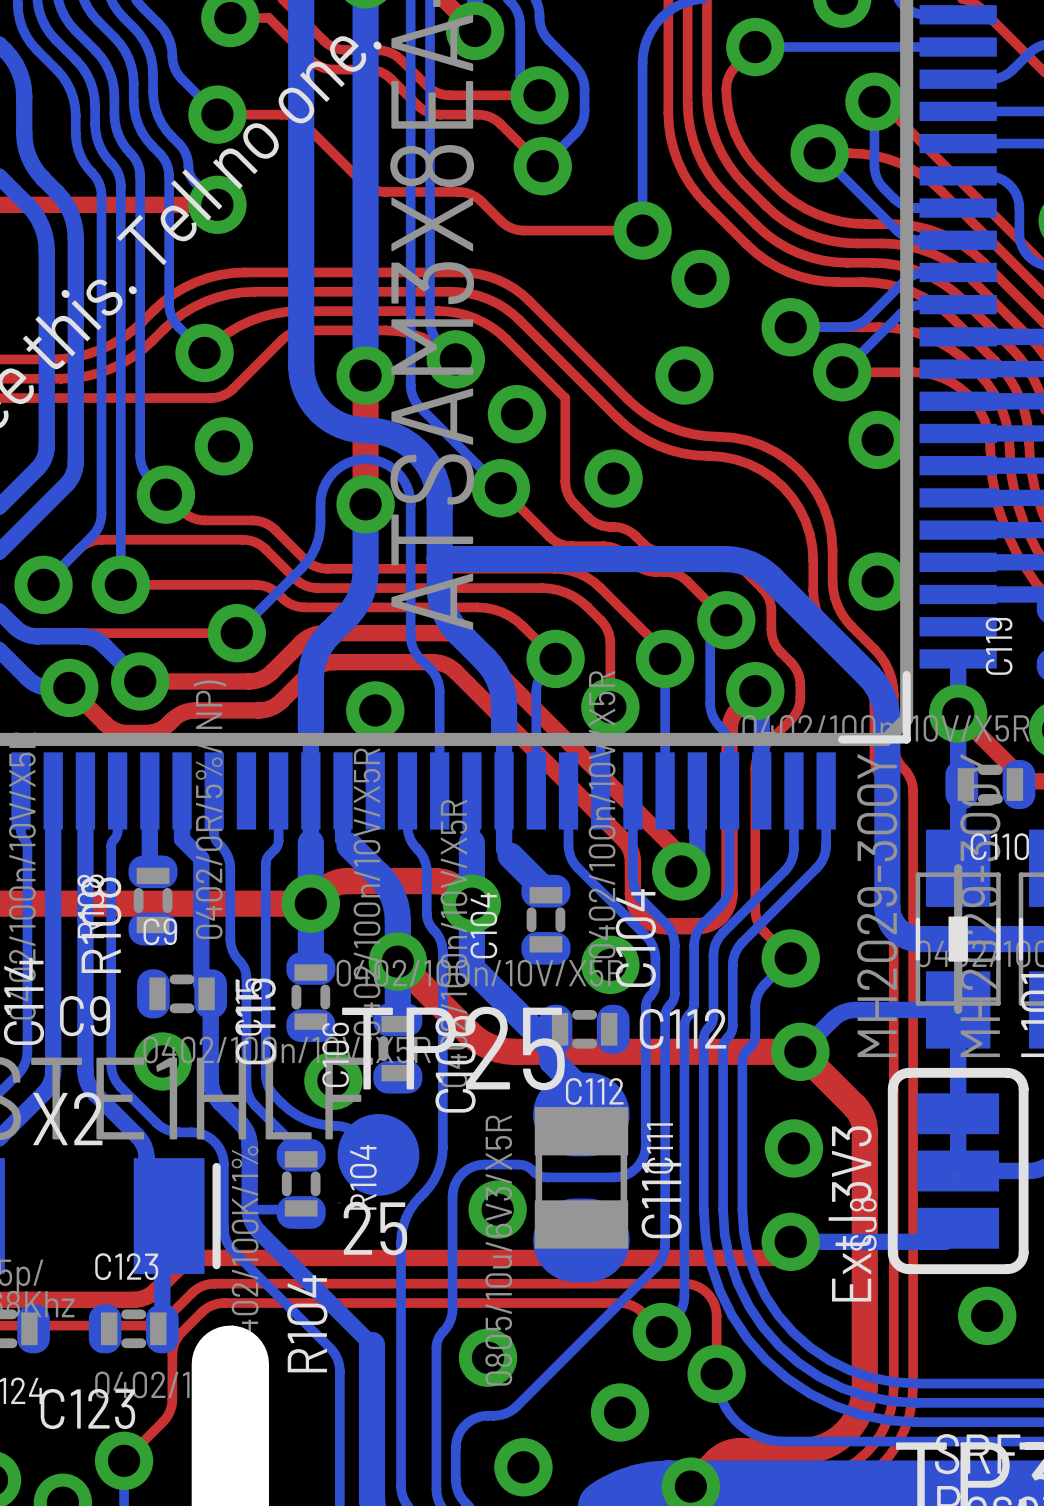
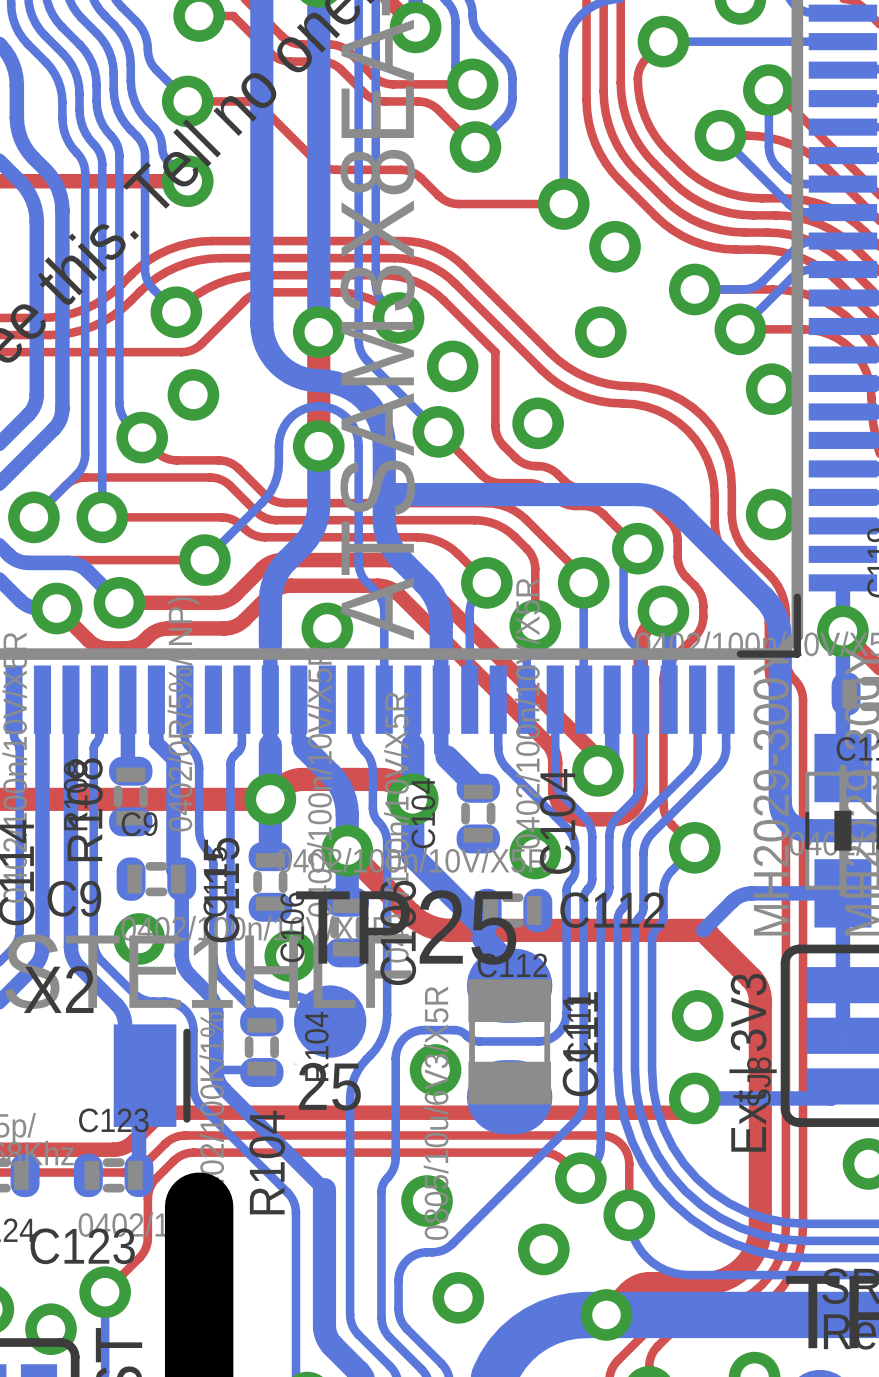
via: (800, 1051) -> none

